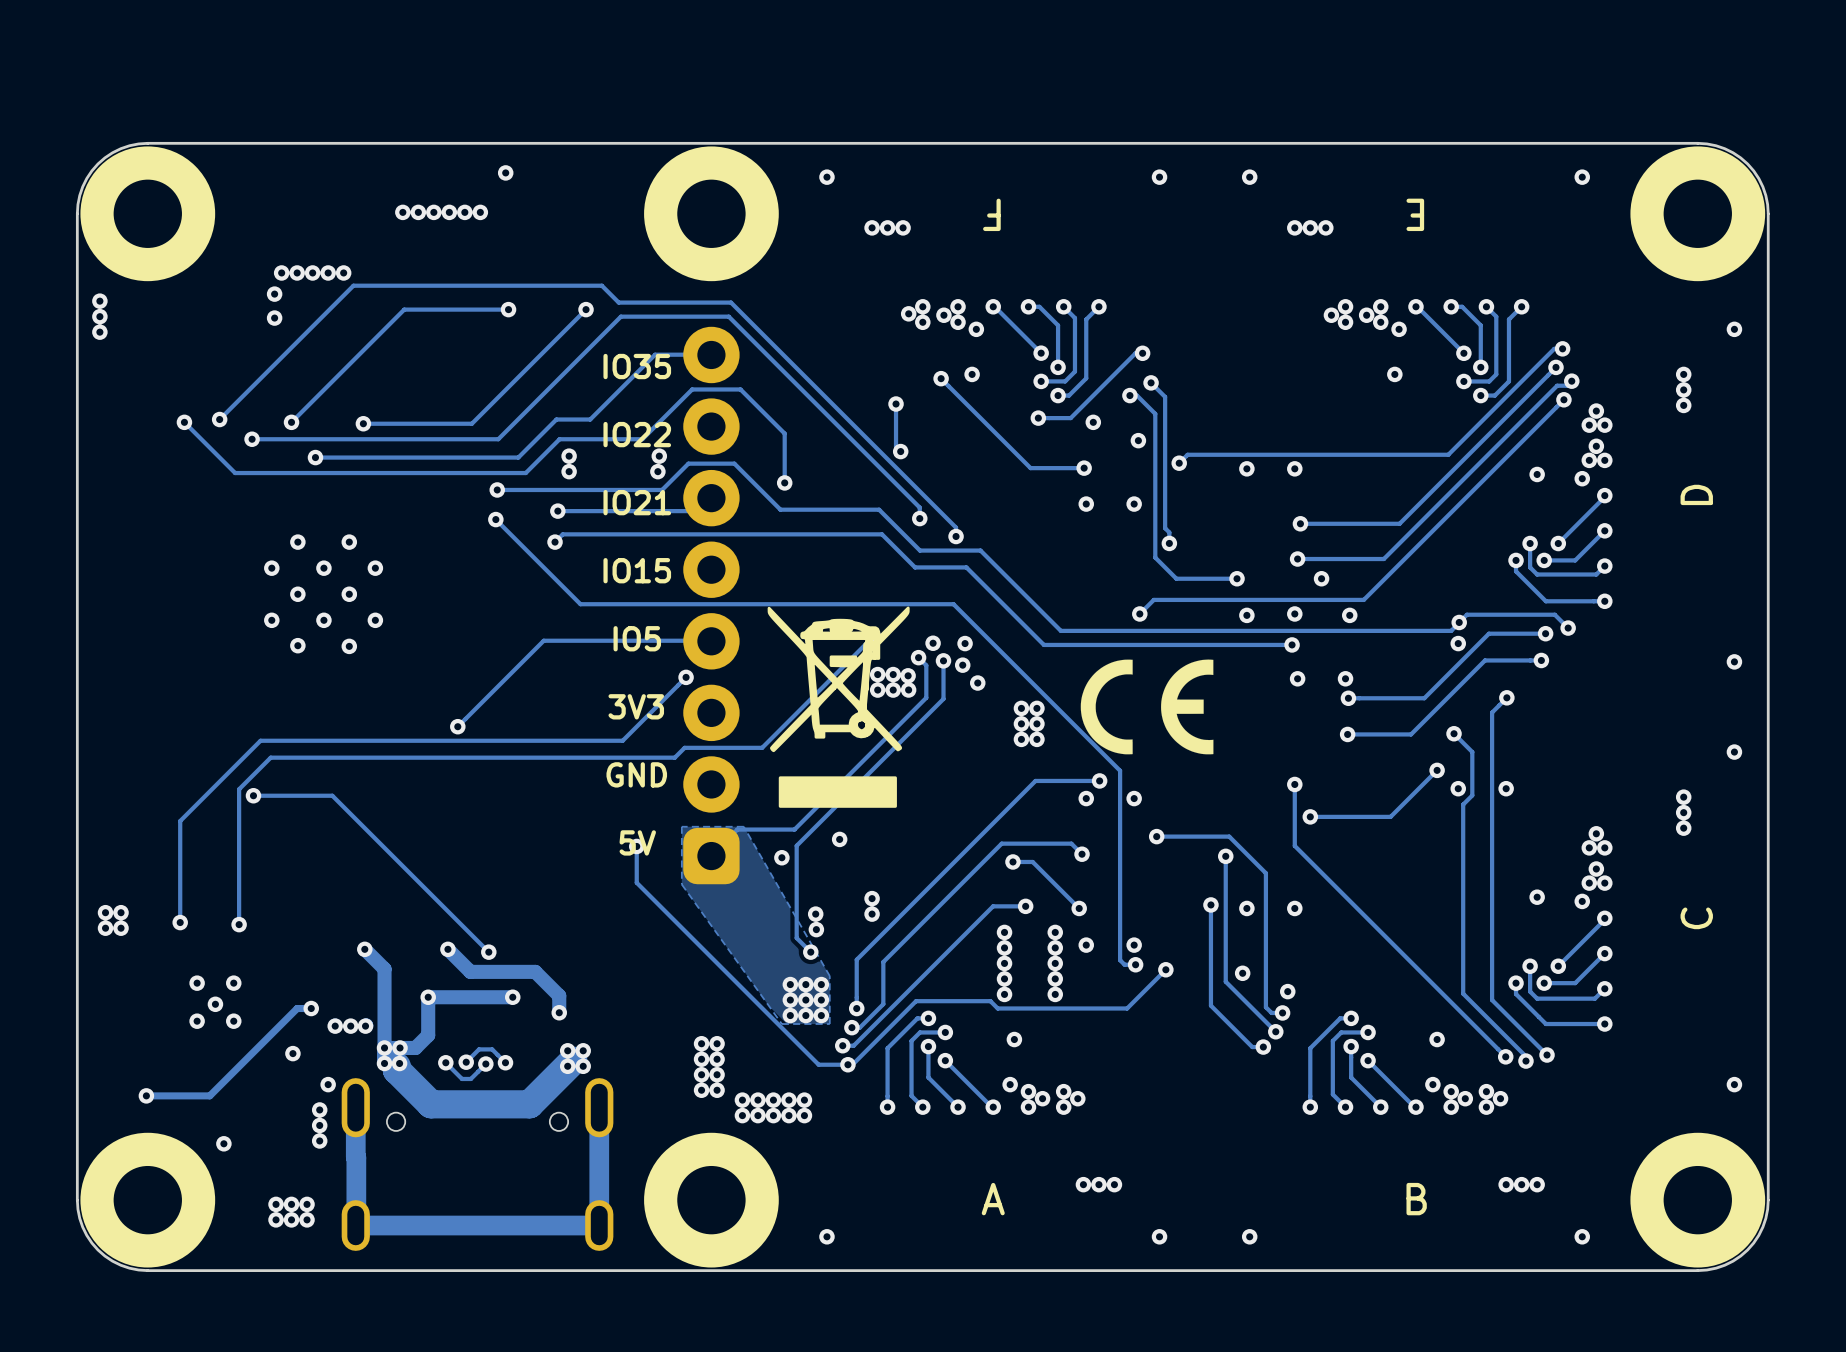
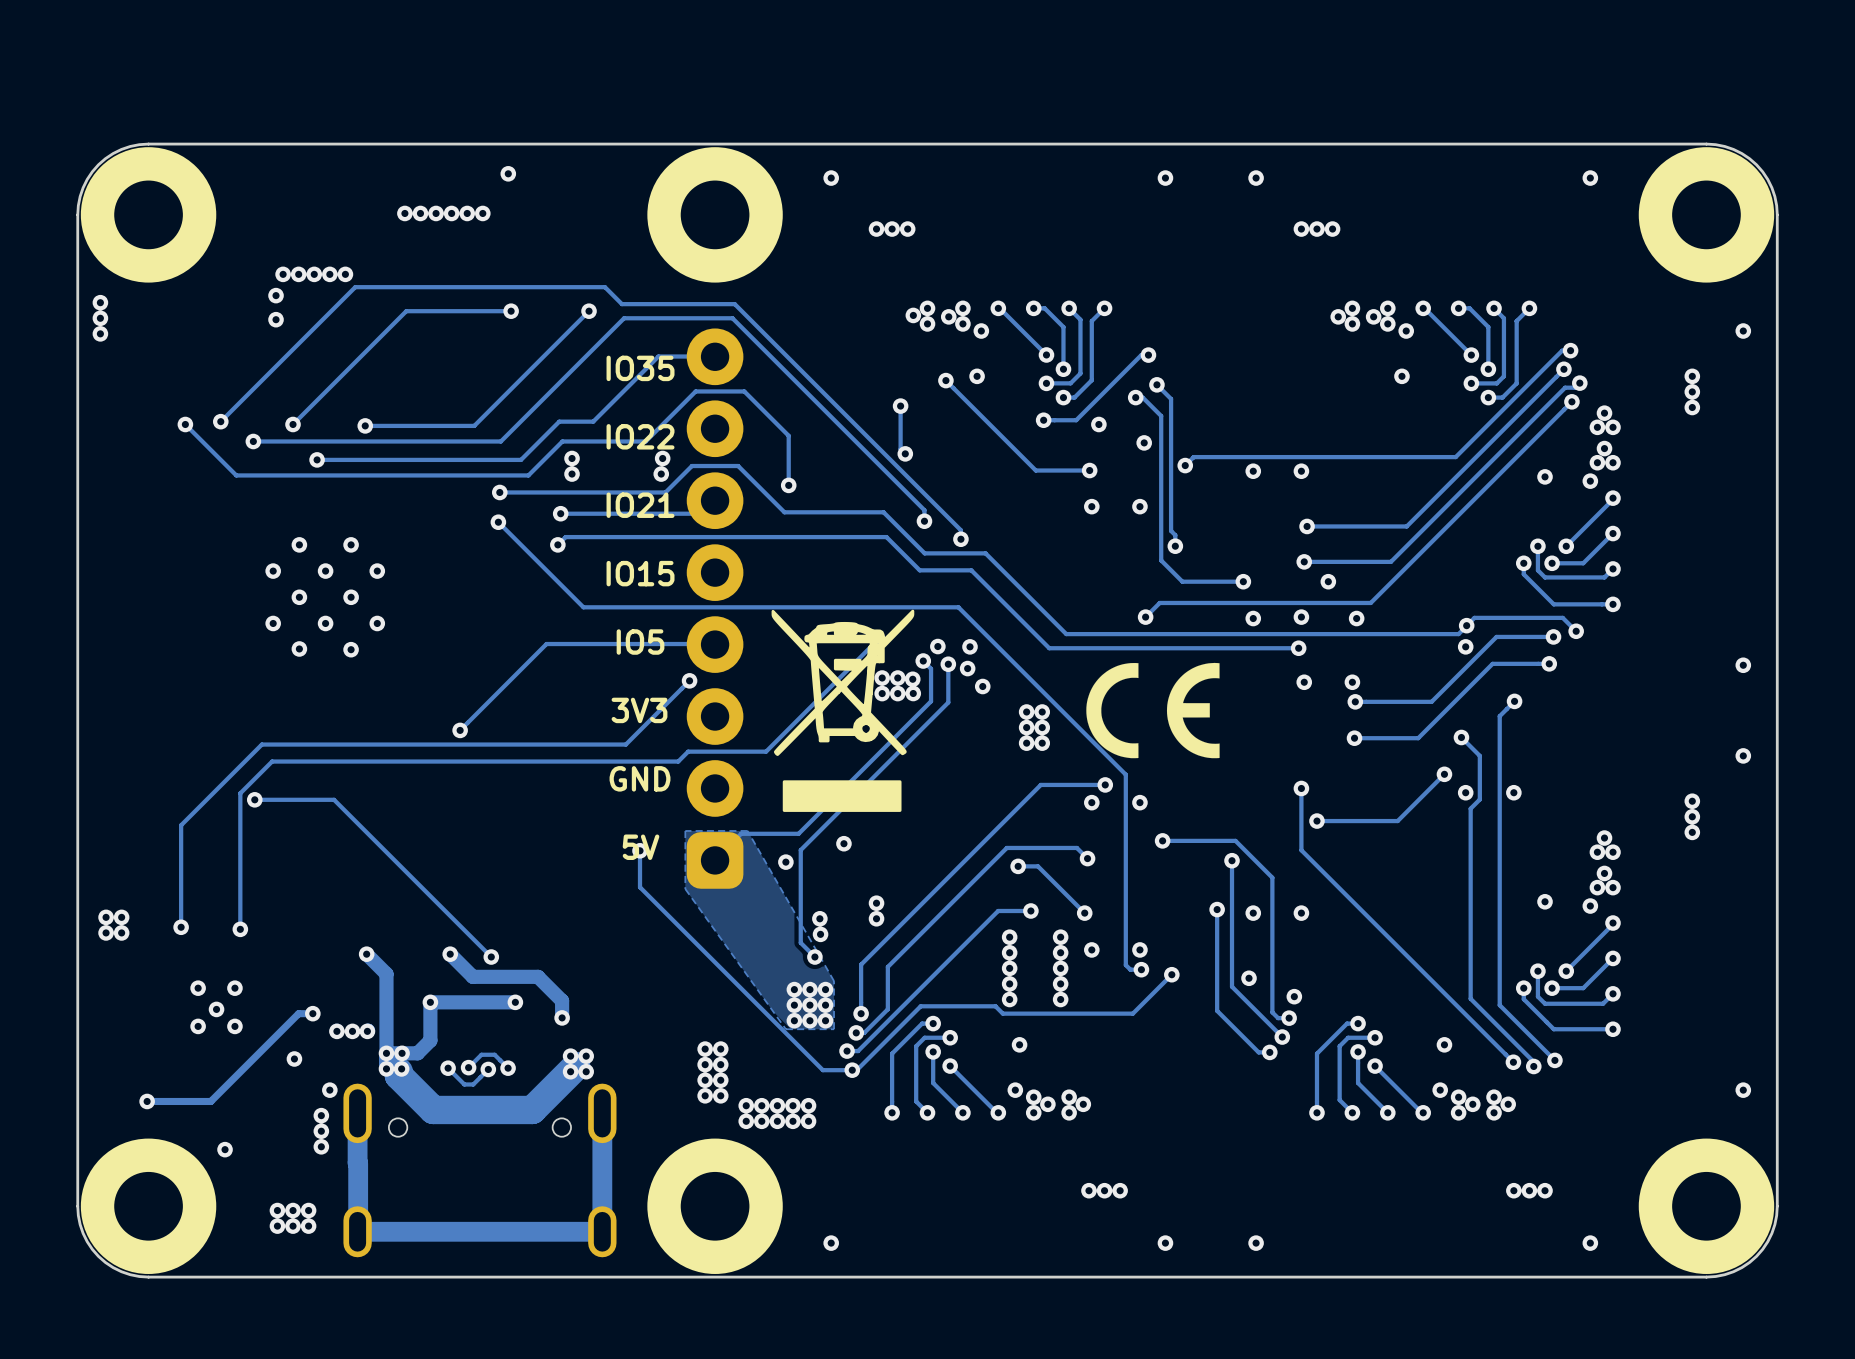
text: F (991, 214) -> none
text: E (1415, 214) -> none
text: D (1696, 494) -> none
text: C (1696, 918) -> none
text: A (993, 1199) -> none
text: B (1416, 1199) -> none

